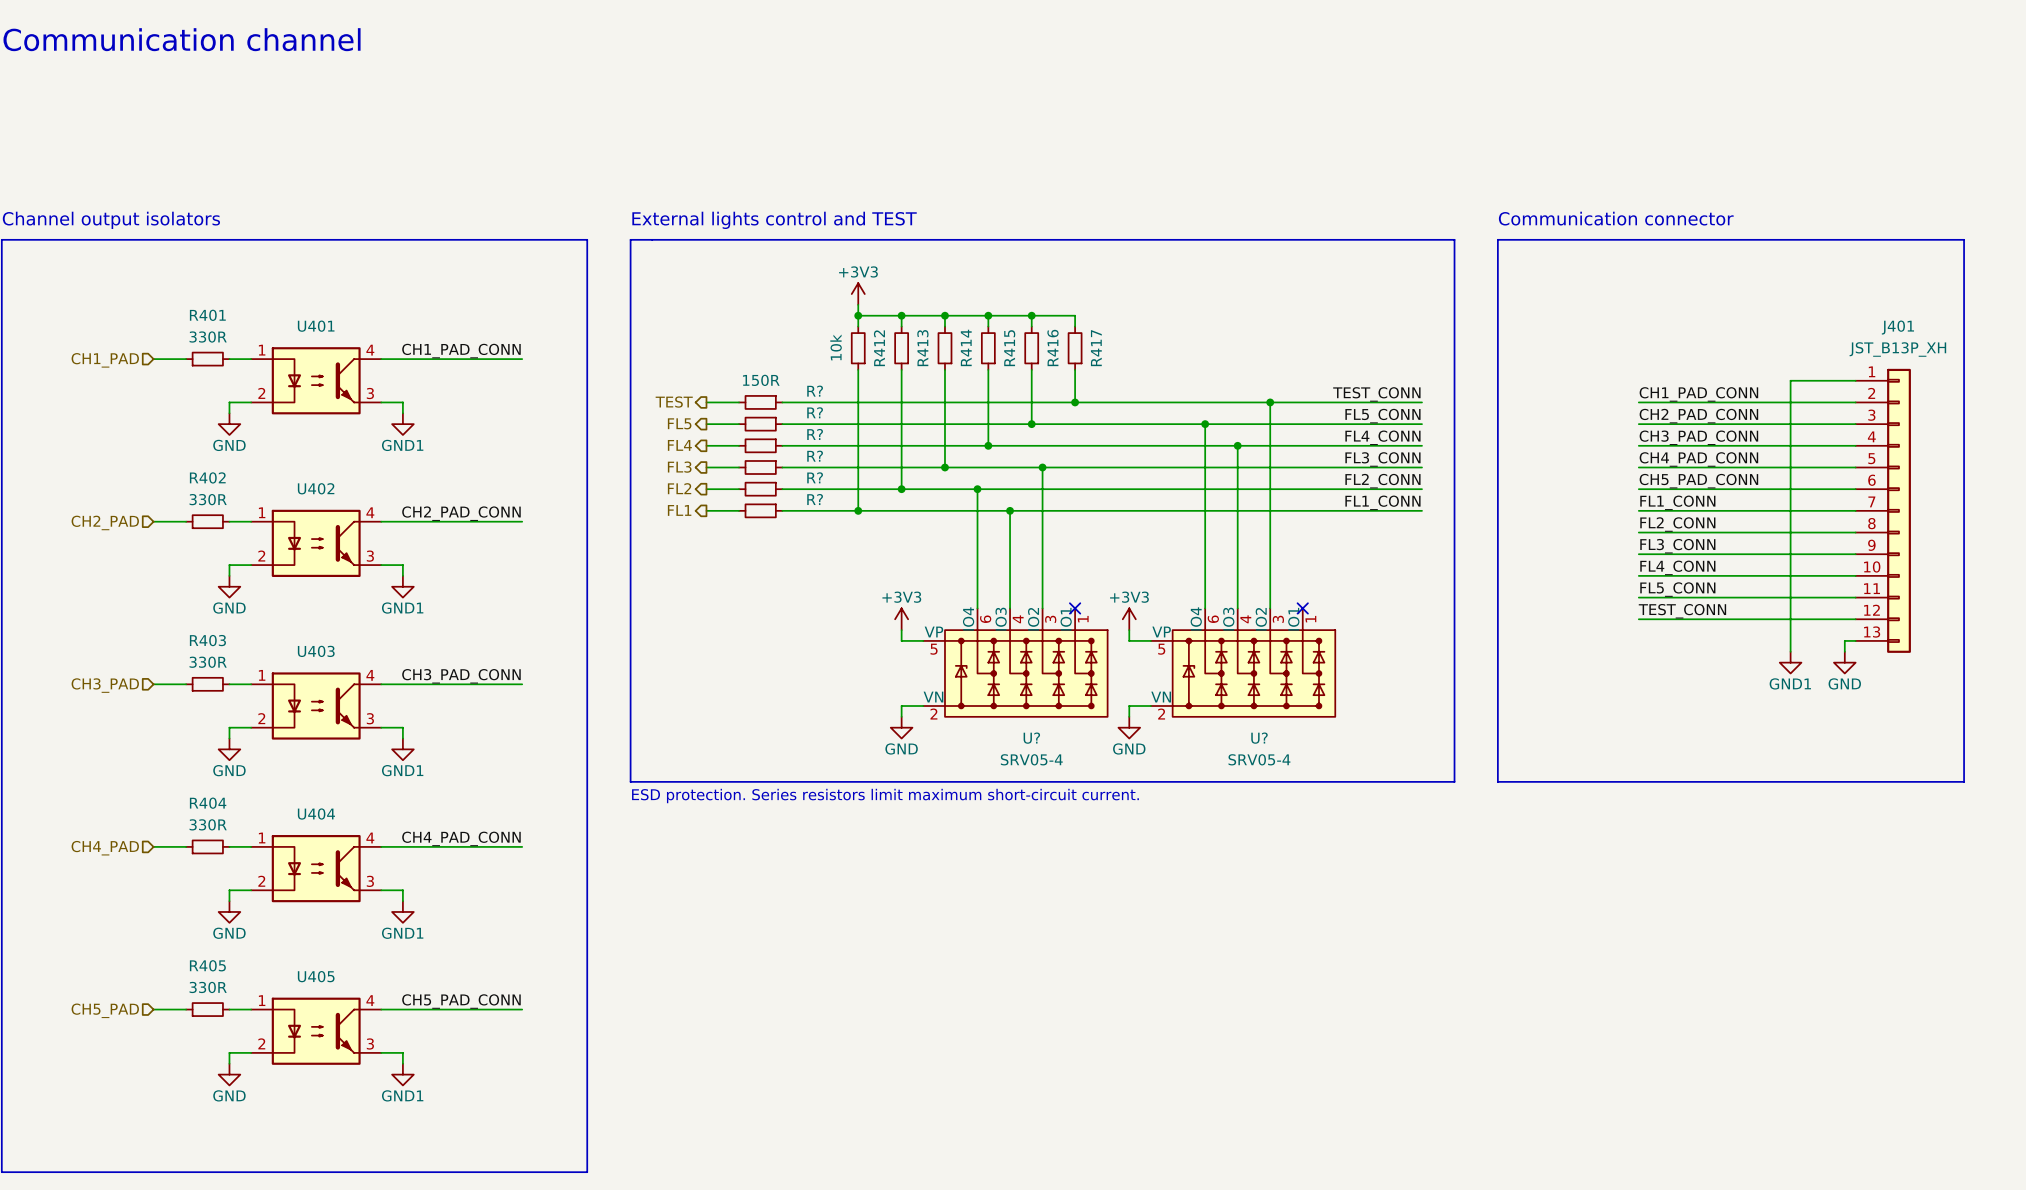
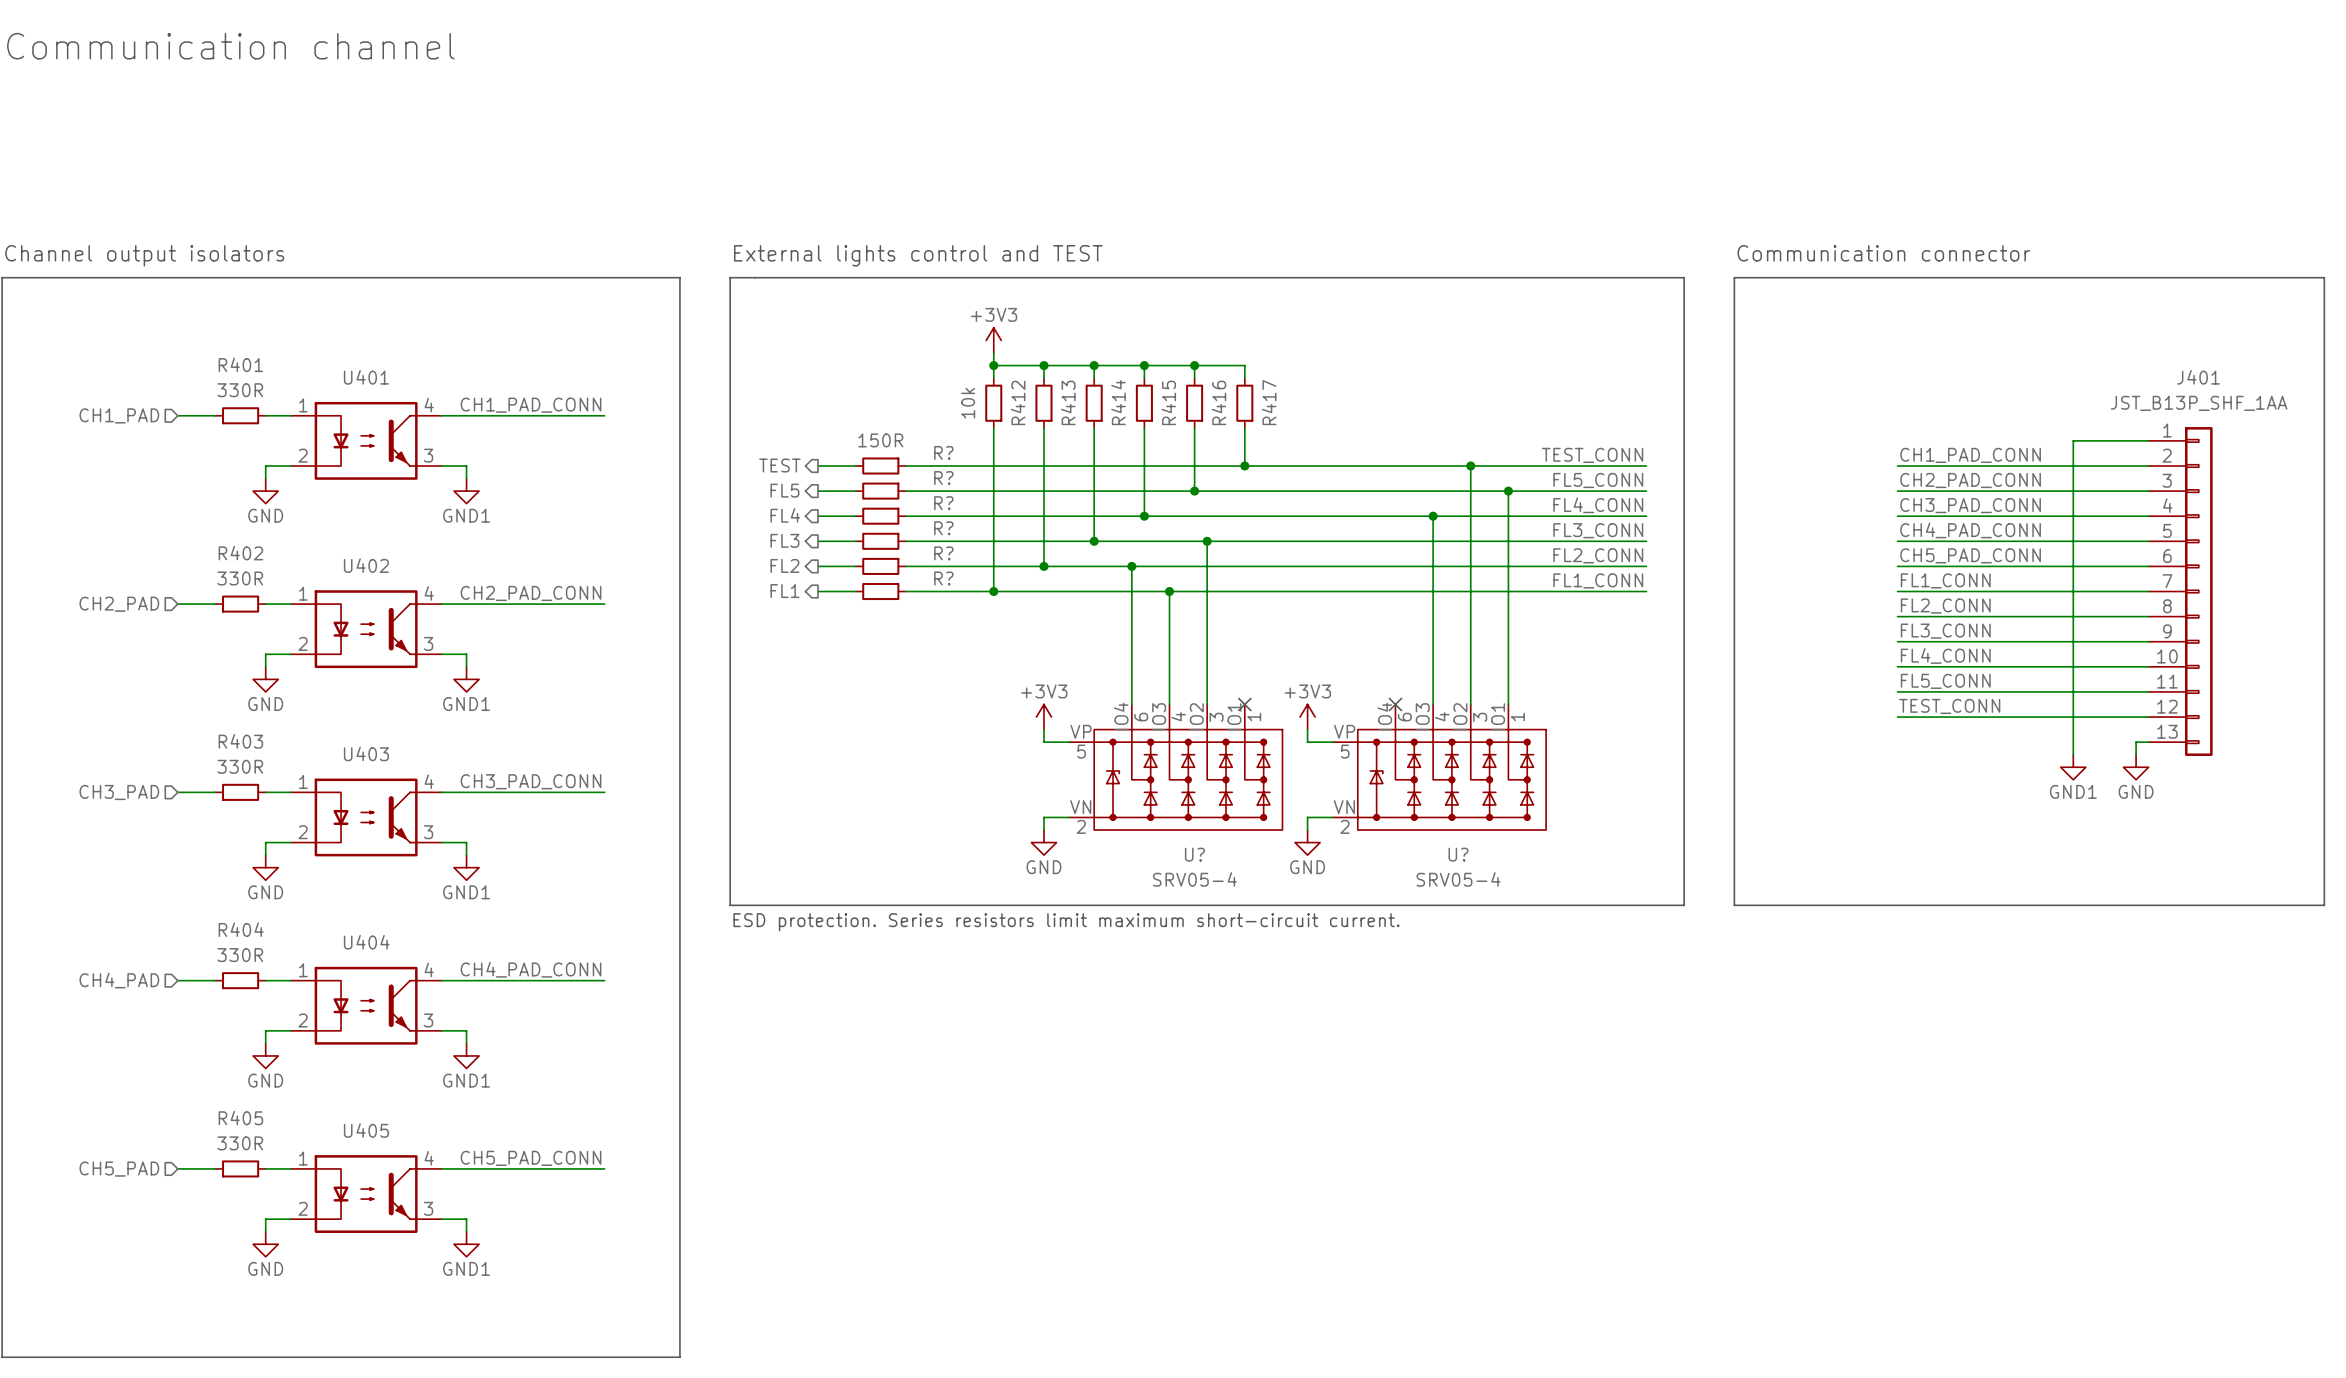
line: (1964, 239) (1964, 781) -> (2274, 277) (2324, 277) (2324, 905) (2274, 905)
J401 value: JST_B13P_XH (1897, 349) -> JST_B13P_SHF_1AA (2199, 403)
wire: (1205, 424) (1205, 608) -> (1508, 491) (1508, 704)
junction: (1205, 424) -> none
junction: none -> (1508, 491)
no-connect mark: none -> (1395, 704)
no-connect mark: (1302, 608) -> none

